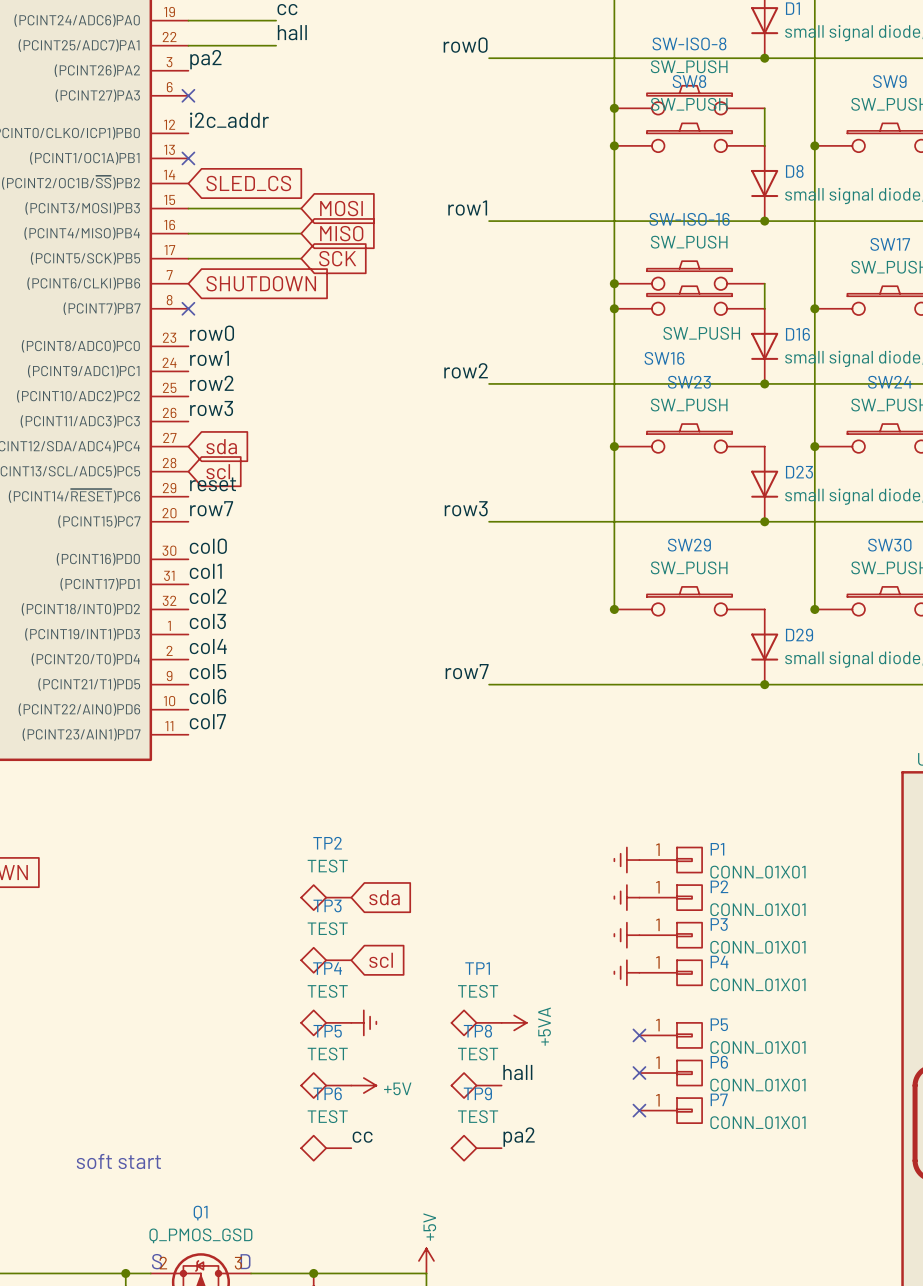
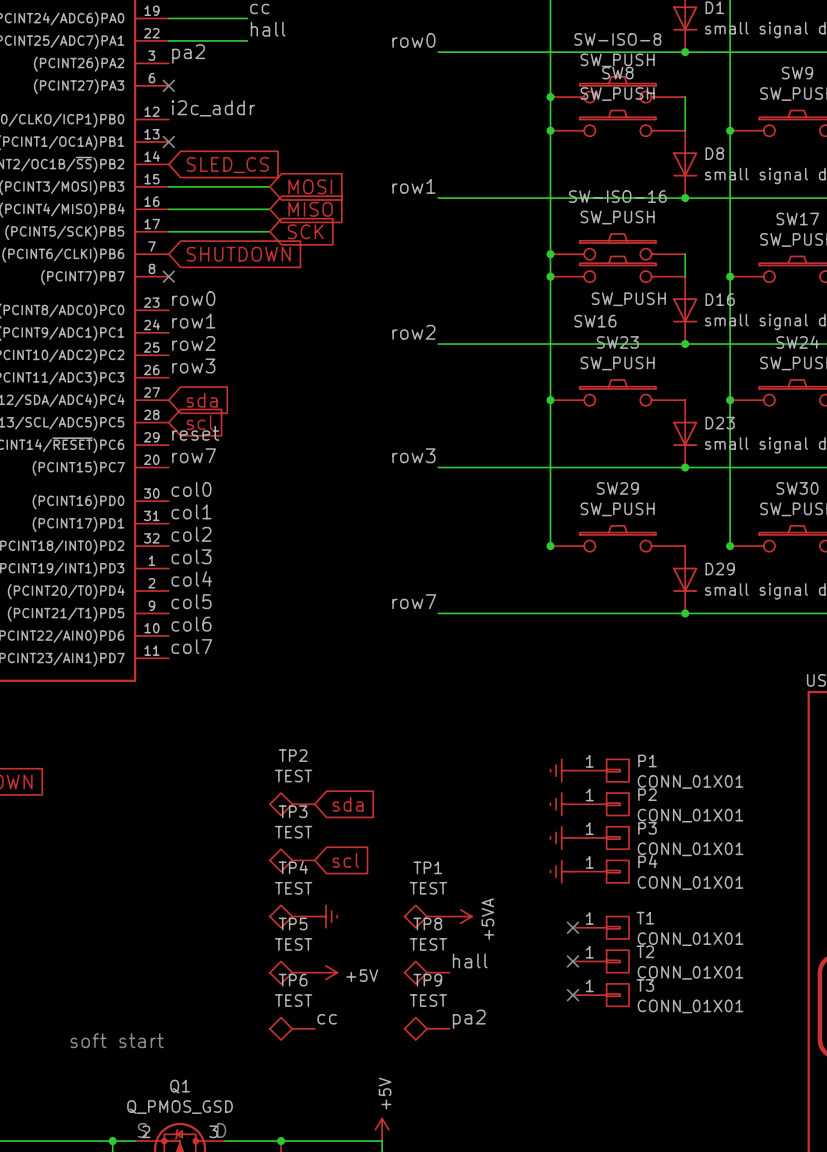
P5 name: P5 (719, 1024) -> T1 (645, 918)
P6 name: P6 (719, 1062) -> T2 (645, 951)
P7 name: P7 (719, 1099) -> T3 (645, 985)

